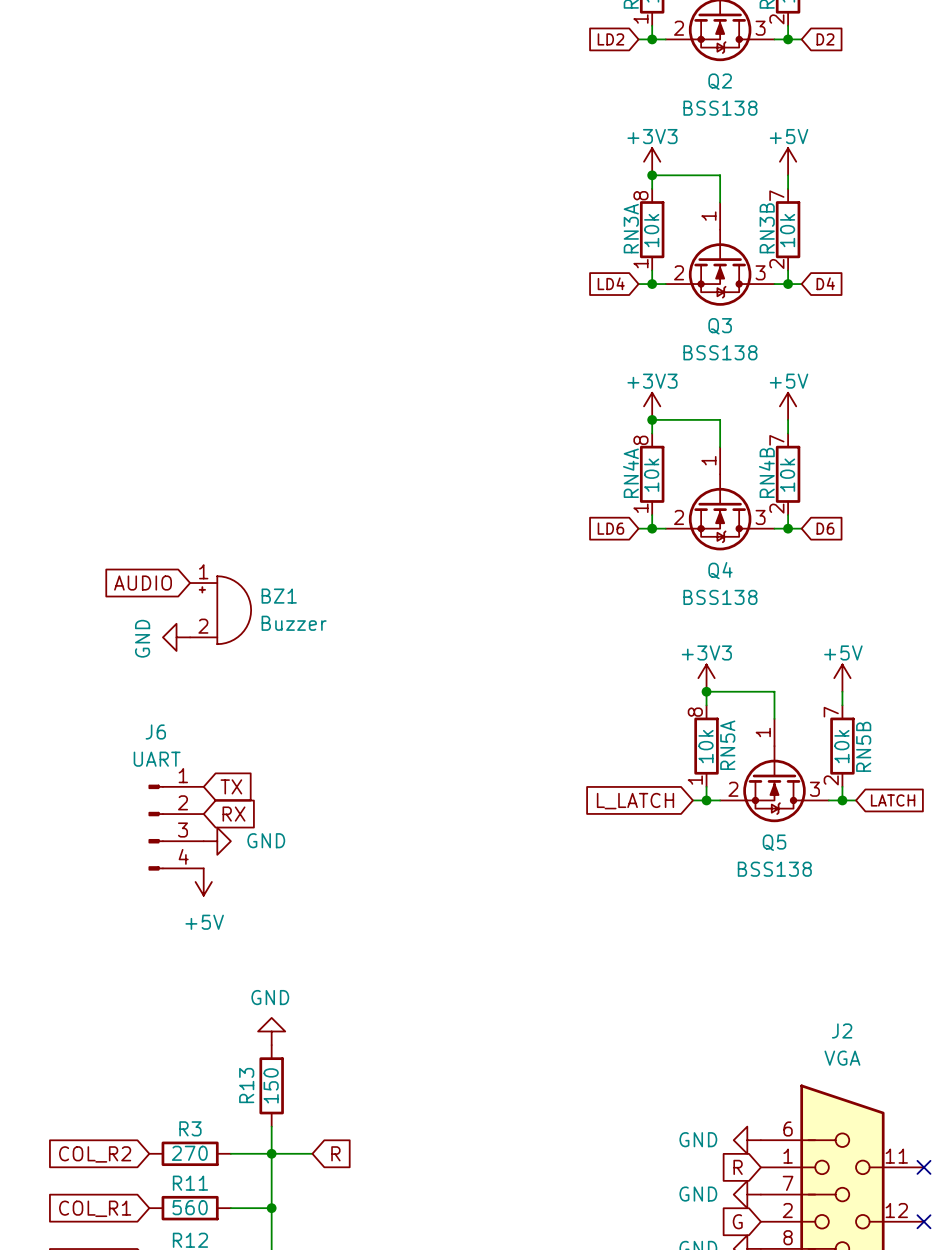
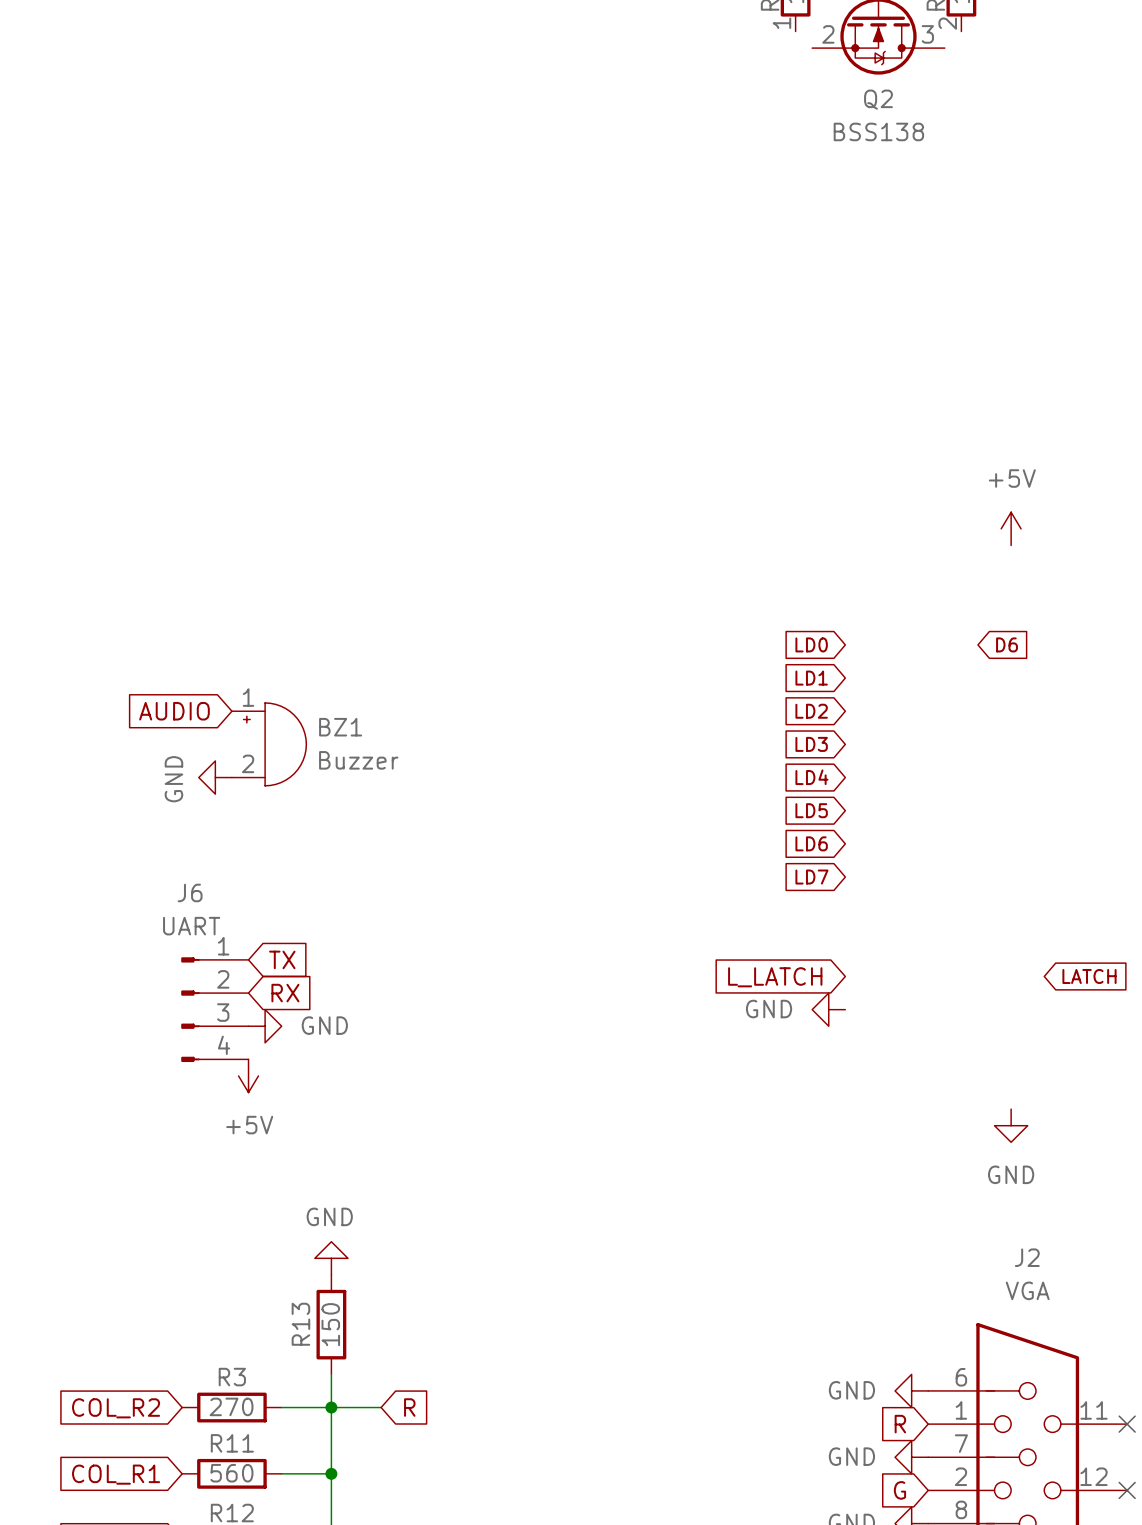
wire: (652, 25) (652, 39) -> none
wire: (788, 25) (788, 39) -> none
global label: LD2 (610, 39) -> none
wire: (638, 39) (665, 39) -> none
junction: (652, 39) -> none
wire: (774, 39) (801, 39) -> none
junction: (788, 39) -> none
global label: D2 (825, 39) -> none
power symbol: +3V3 (652, 161) -> none
power symbol: +5V (788, 161) -> none
junction: (652, 175) -> none
wire: (788, 175) (788, 188) -> none
wire: (652, 188) (652, 175) (720, 175) (720, 202) -> none
RN3A: 10k (652, 229) -> none
RN3B: 10k (788, 229) -> none
Q3: BSS138 (720, 254) -> none
wire: (652, 270) (652, 284) -> none
wire: (788, 270) (788, 284) -> none
global label: LD4 (611, 283) -> none
global label: D4 (825, 283) -> none
wire: (638, 284) (665, 284) -> none
junction: (652, 284) -> none
wire: (774, 284) (801, 284) -> none
junction: (788, 284) -> none
power symbol text position: +5V (789, 381) -> +5V (1012, 478)
power symbol: +3V3 (652, 406) -> none
power symbol position: +5V (788, 406) -> +5V (1011, 528)
junction: (652, 419) -> none
wire: (788, 419) (788, 433) -> none
wire: (652, 433) (652, 419) (720, 419) (720, 447) -> none
RN4A: 10k (652, 474) -> none
RN4B: 10k (788, 474) -> none
Q4: BSS138 (720, 498) -> none
wire: (652, 515) (652, 528) -> none
wire: (788, 515) (788, 528) -> none
global label position: LD6 (610, 528) -> LD6 (811, 843)
wire: (638, 528) (665, 528) -> none
junction: (652, 528) -> none
global label: none -> LD0 (811, 644)
wire: (774, 528) (801, 528) -> none
junction: (788, 528) -> none
global label: none -> LD1 (811, 678)
global label: none -> LD2 (811, 711)
global label: none -> LD3 (811, 744)
global label: none -> LD4 (811, 777)
global label: none -> LD5 (811, 810)
power symbol: +3V3 (706, 678) -> none
power symbol: +5V (842, 678) -> none
junction: (706, 691) -> none
wire: (842, 691) (842, 705) -> none
wire: (706, 705) (706, 691) (774, 691) (774, 718) -> none
global label: none -> LD7 (811, 877)
RN5A: 10k (706, 746) -> none
RN5B: 10k (842, 746) -> none
Q5: BSS138 (774, 770) -> none
wire: (706, 786) (706, 800) -> none
wire: (842, 786) (842, 800) -> none
wire: (692, 800) (720, 800) -> none
junction: (706, 800) -> none
wire: (828, 800) (856, 800) -> none
junction: (842, 800) -> none
power symbol: none -> GND (828, 1009)
power symbol: none -> GND (1011, 1125)

